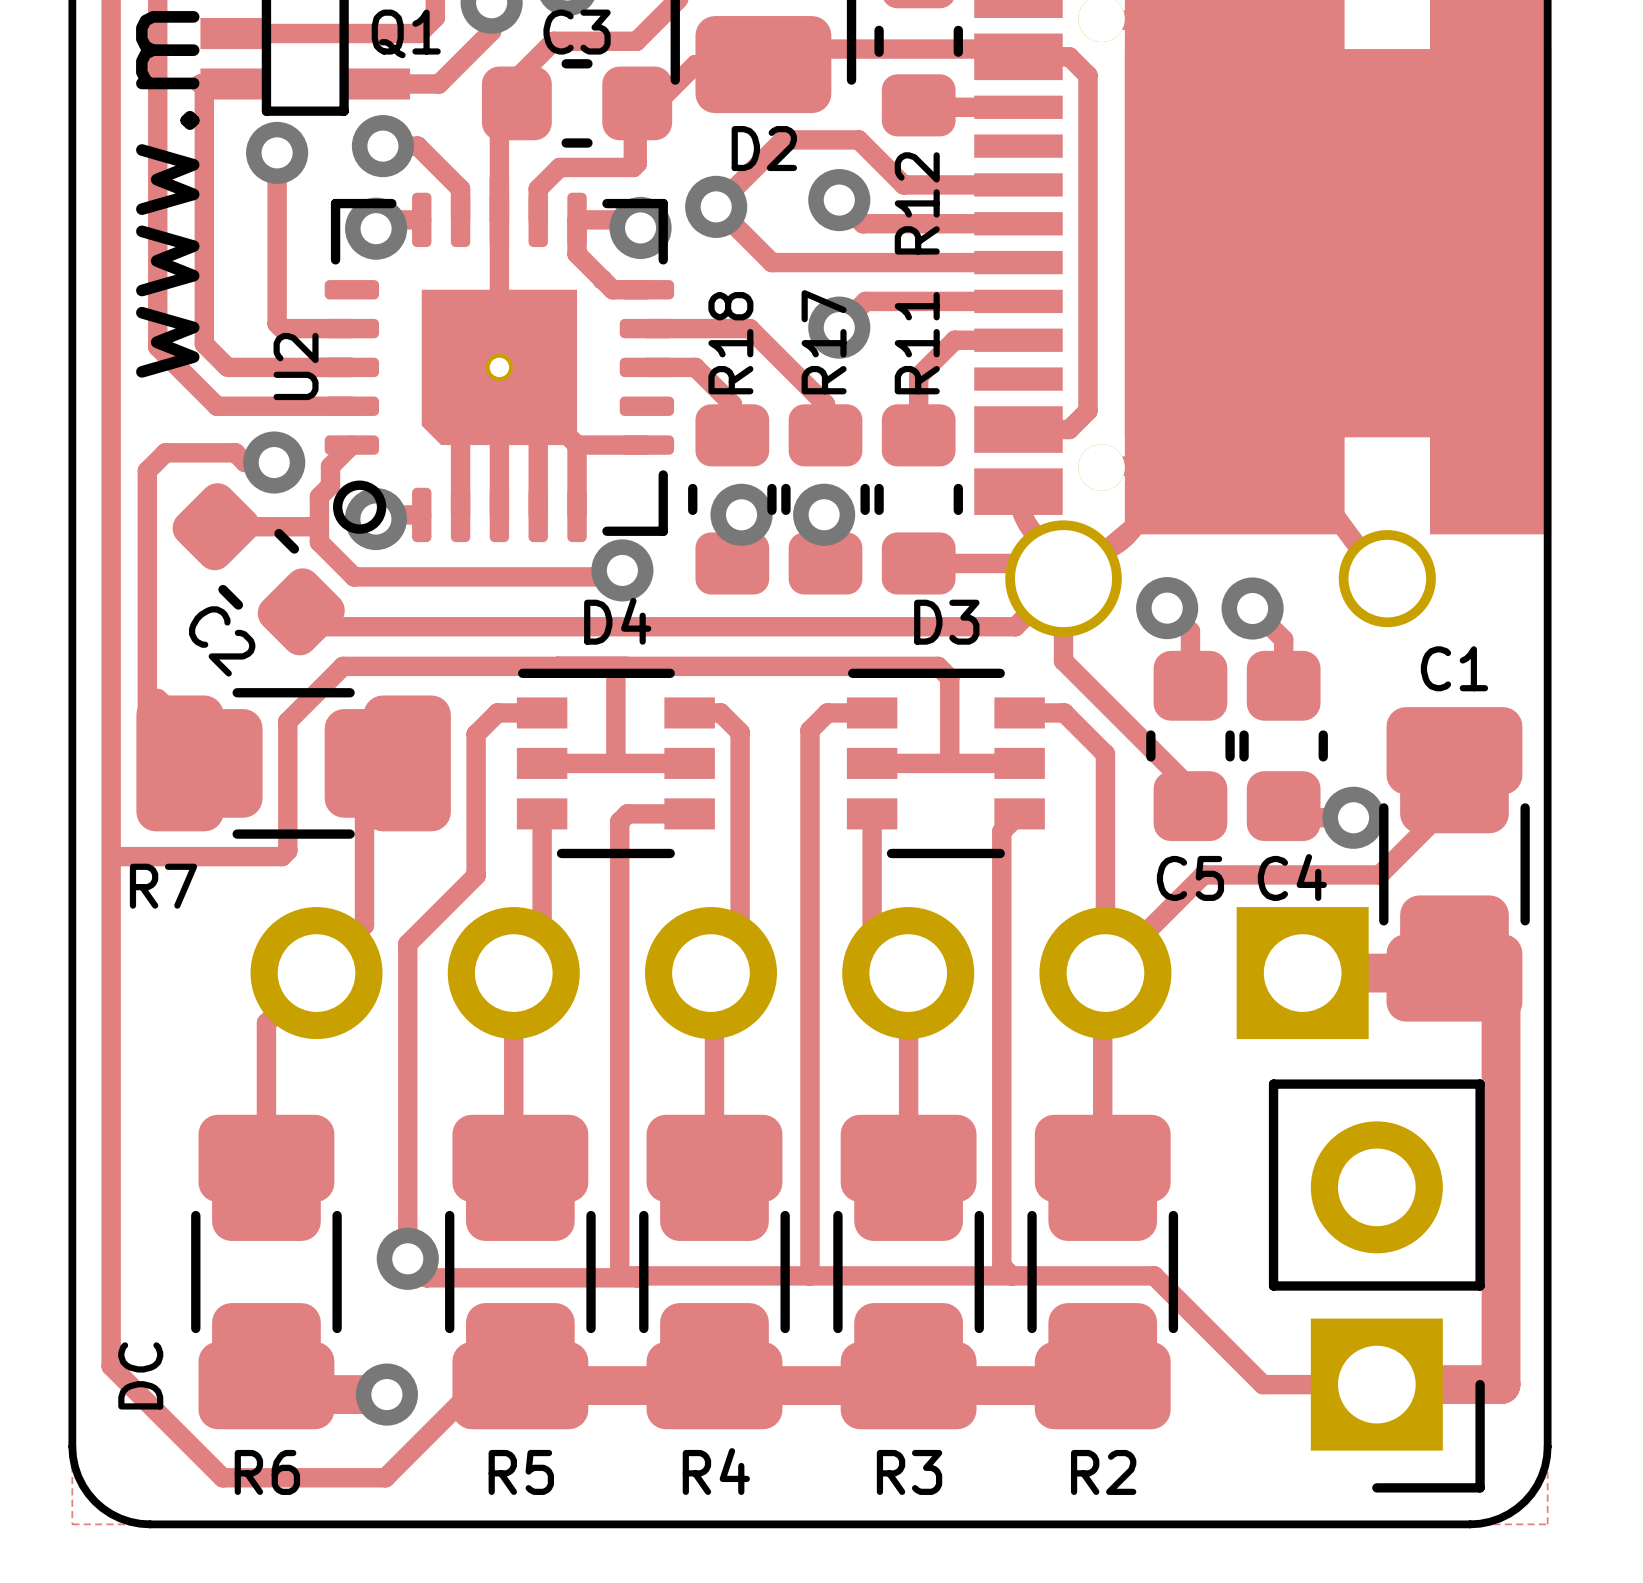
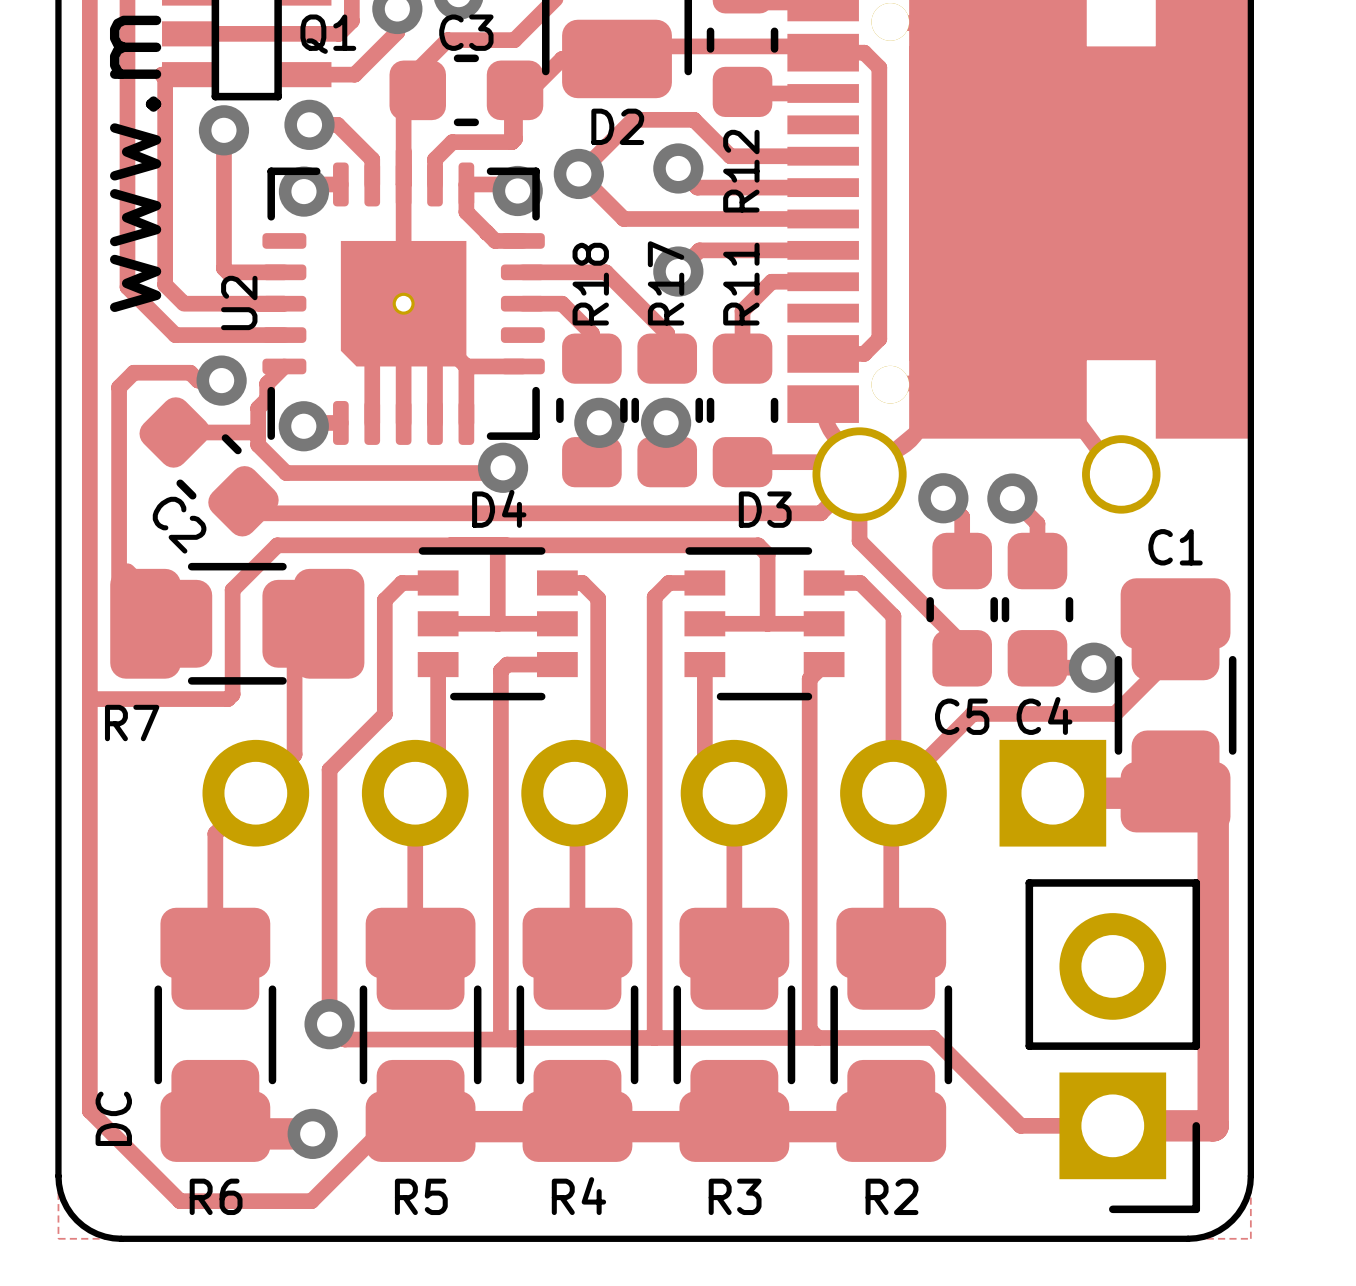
U2 footprint: [324, 192, 675, 543] -> [262, 162, 545, 445]

